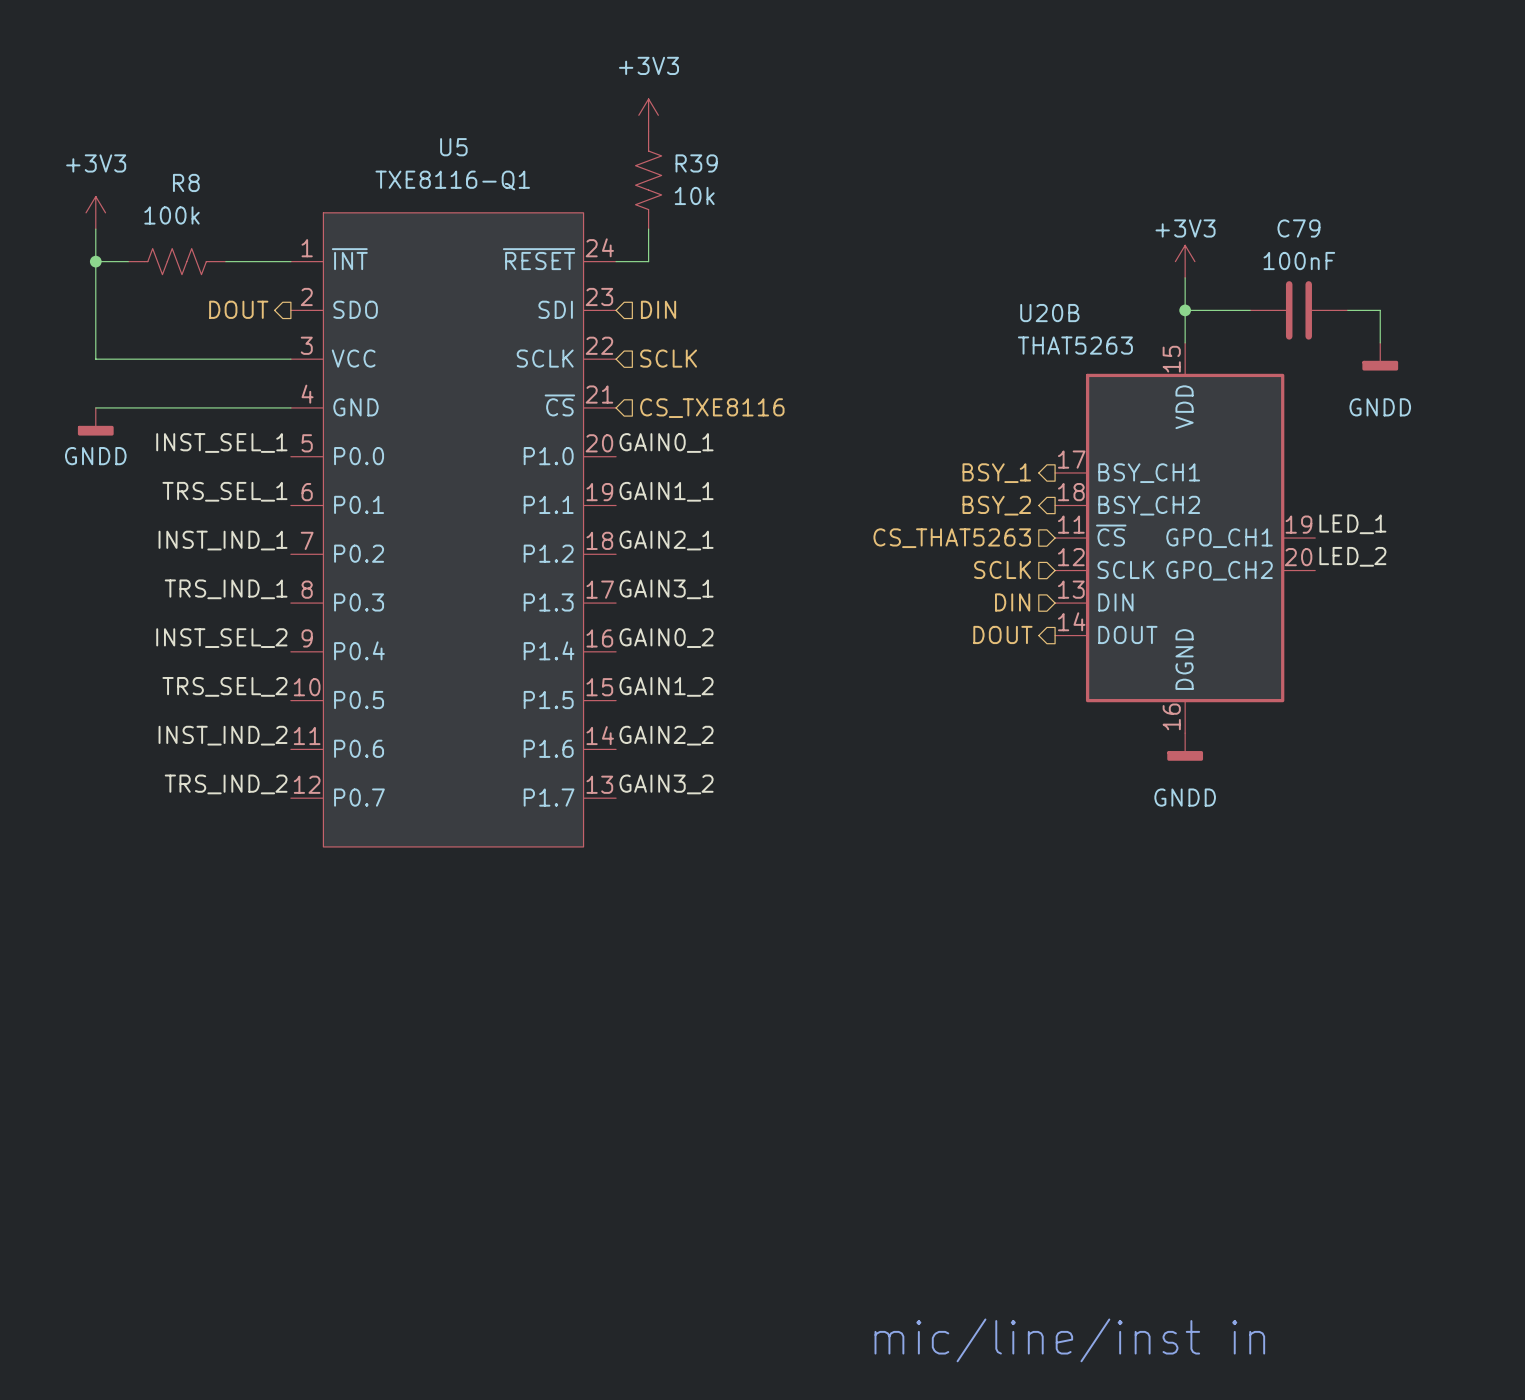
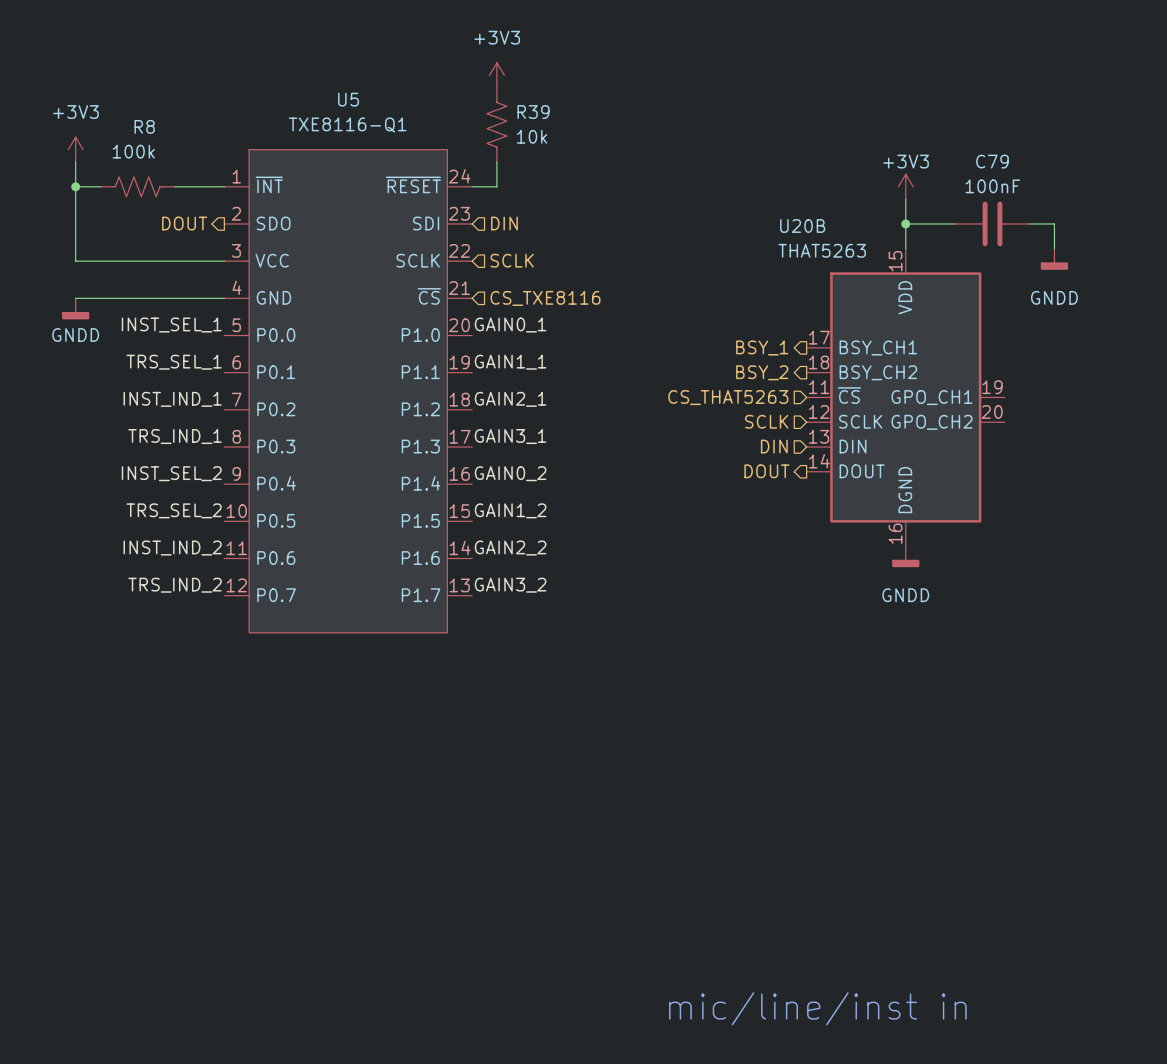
label: LED_1 (1352, 524) -> none
label: LED_2 (1352, 556) -> none

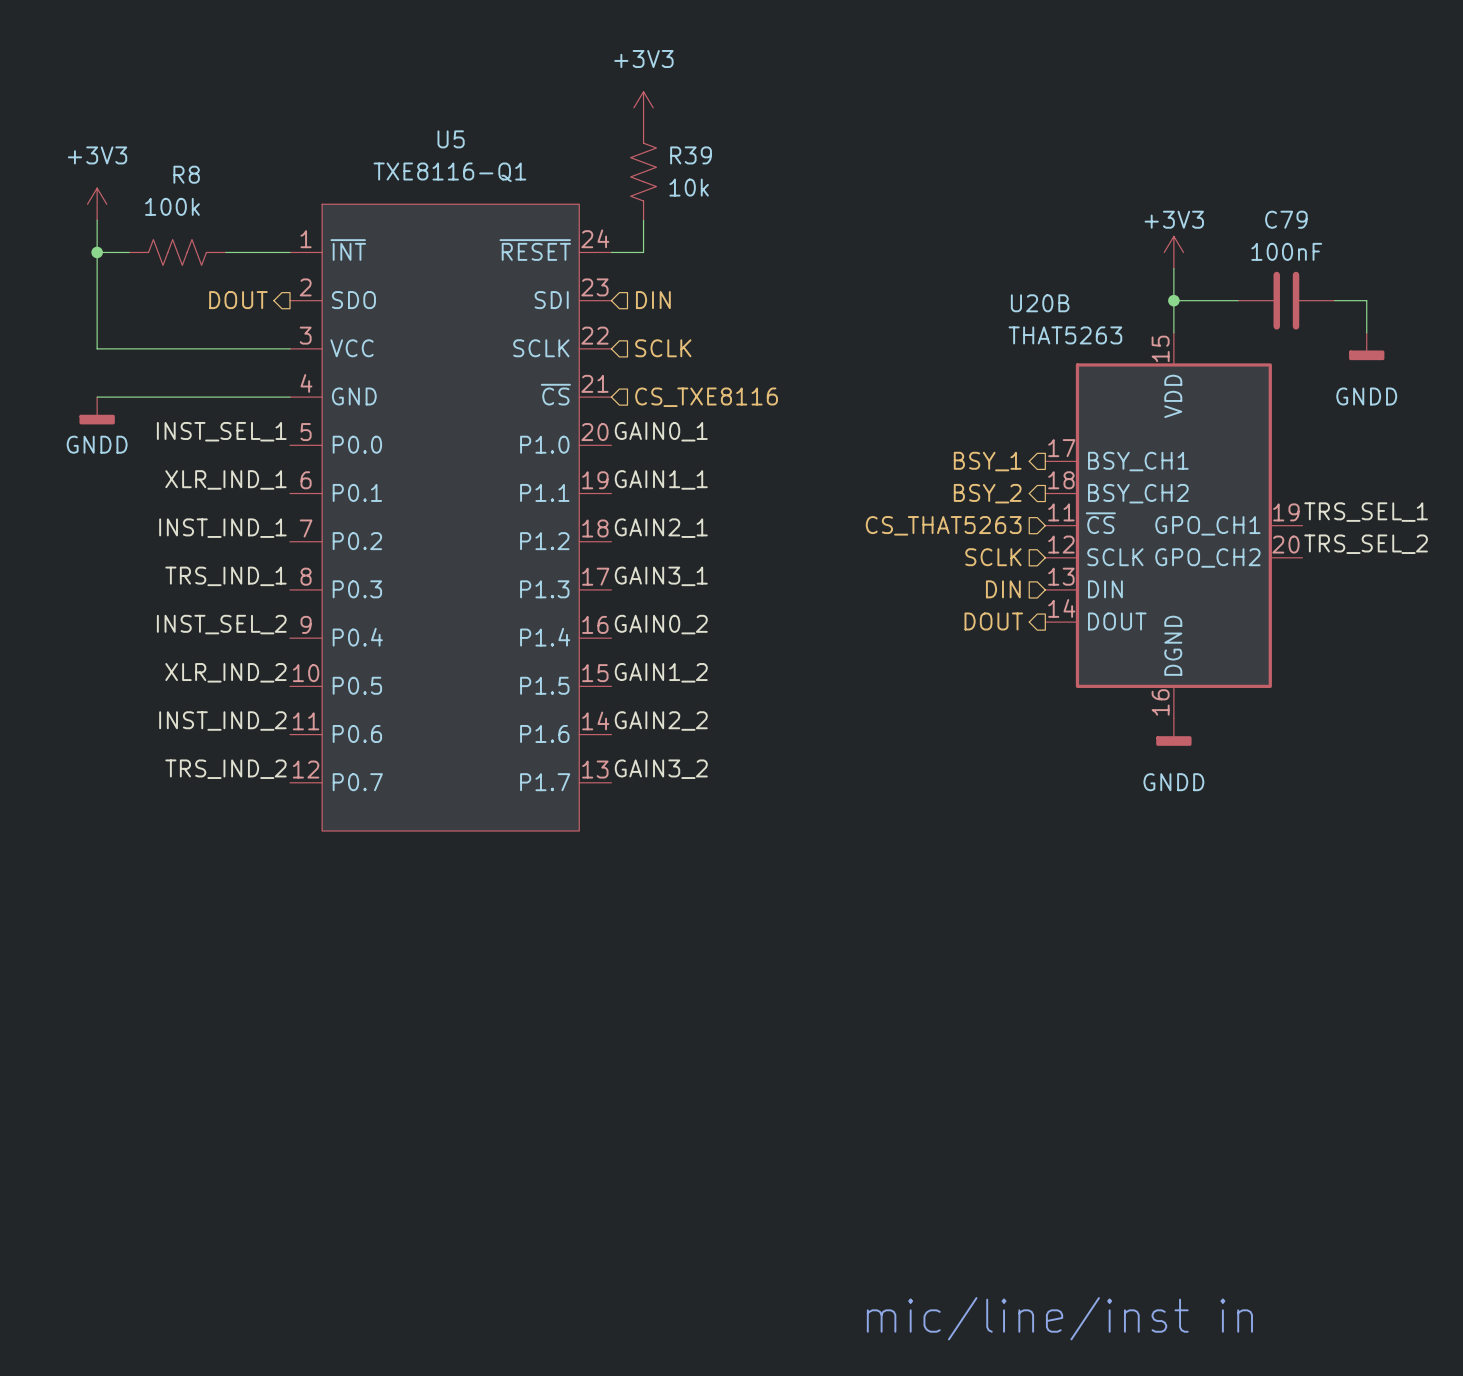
label: TRS_SEL_1 (174, 362) -> XLR_IND_1 (225, 479)
label: none -> TRS_SEL_1 (1366, 512)
label: none -> TRS_SEL_2 (1366, 544)
label: TRS_SEL_2 (174, 510) -> XLR_IND_2 (225, 672)

